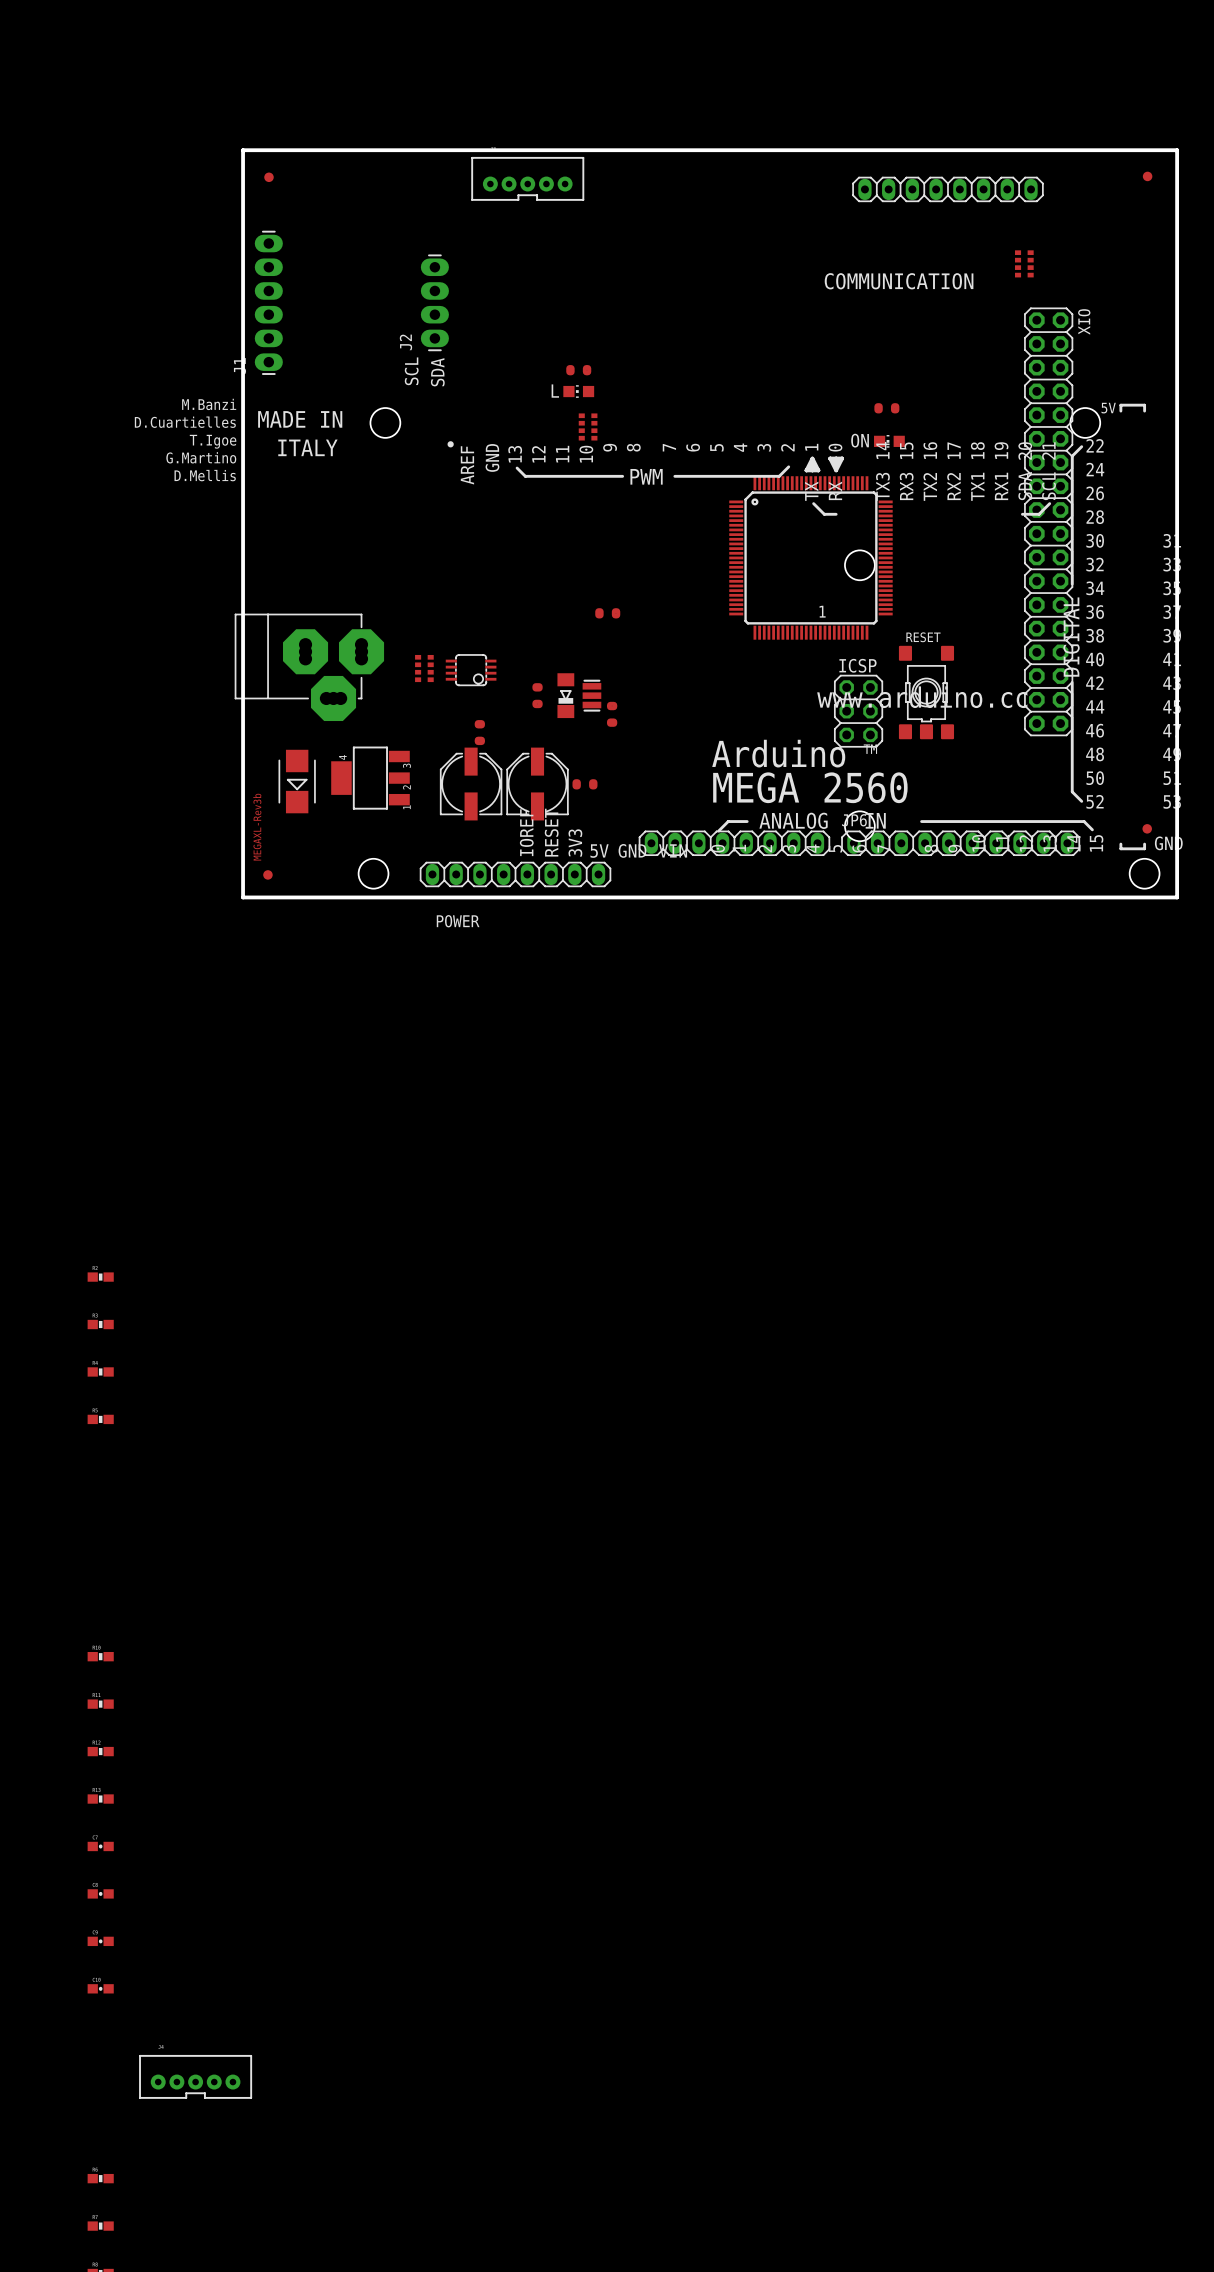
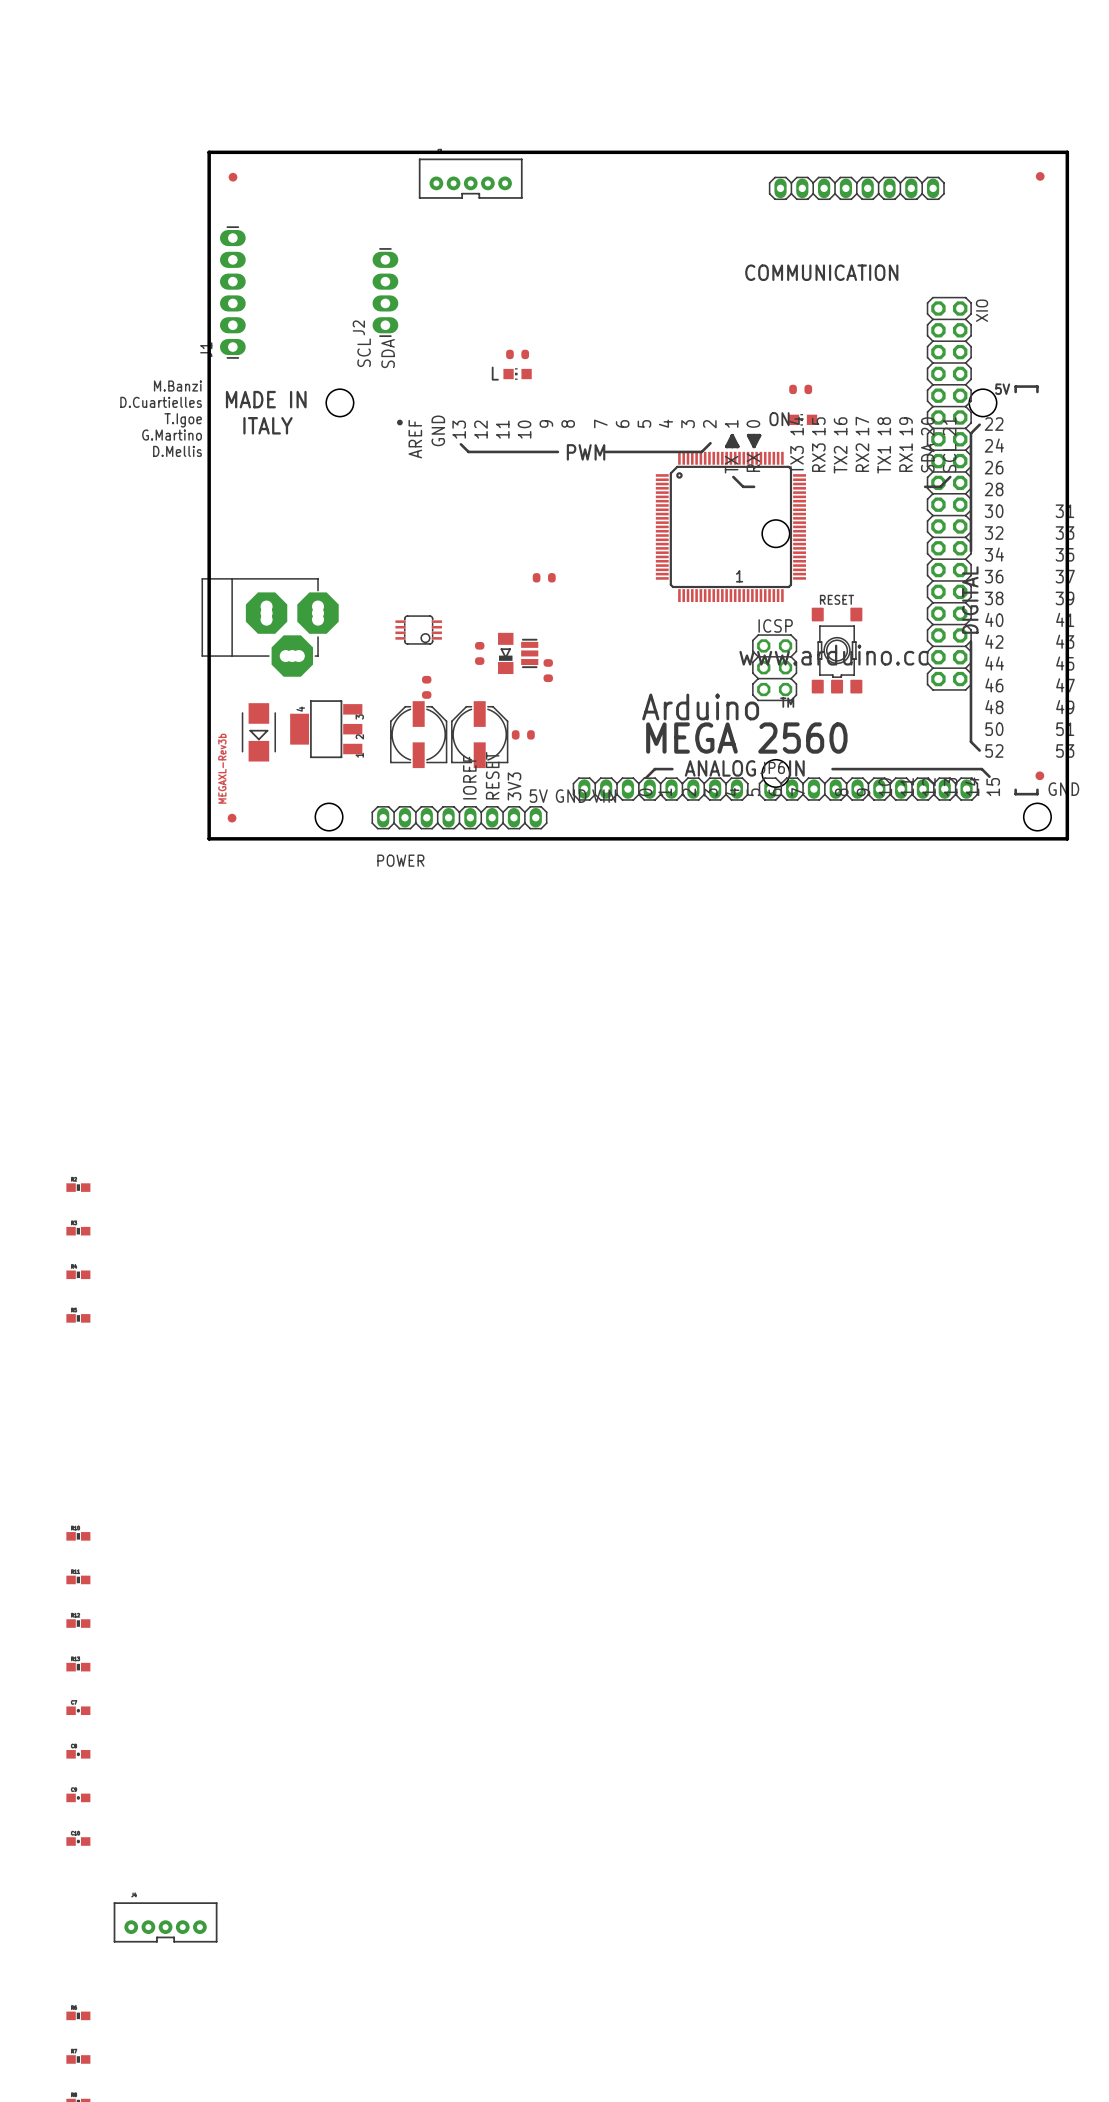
part: (1024, 263) -> none
part: (588, 426) -> none
part: (424, 668) -> none

